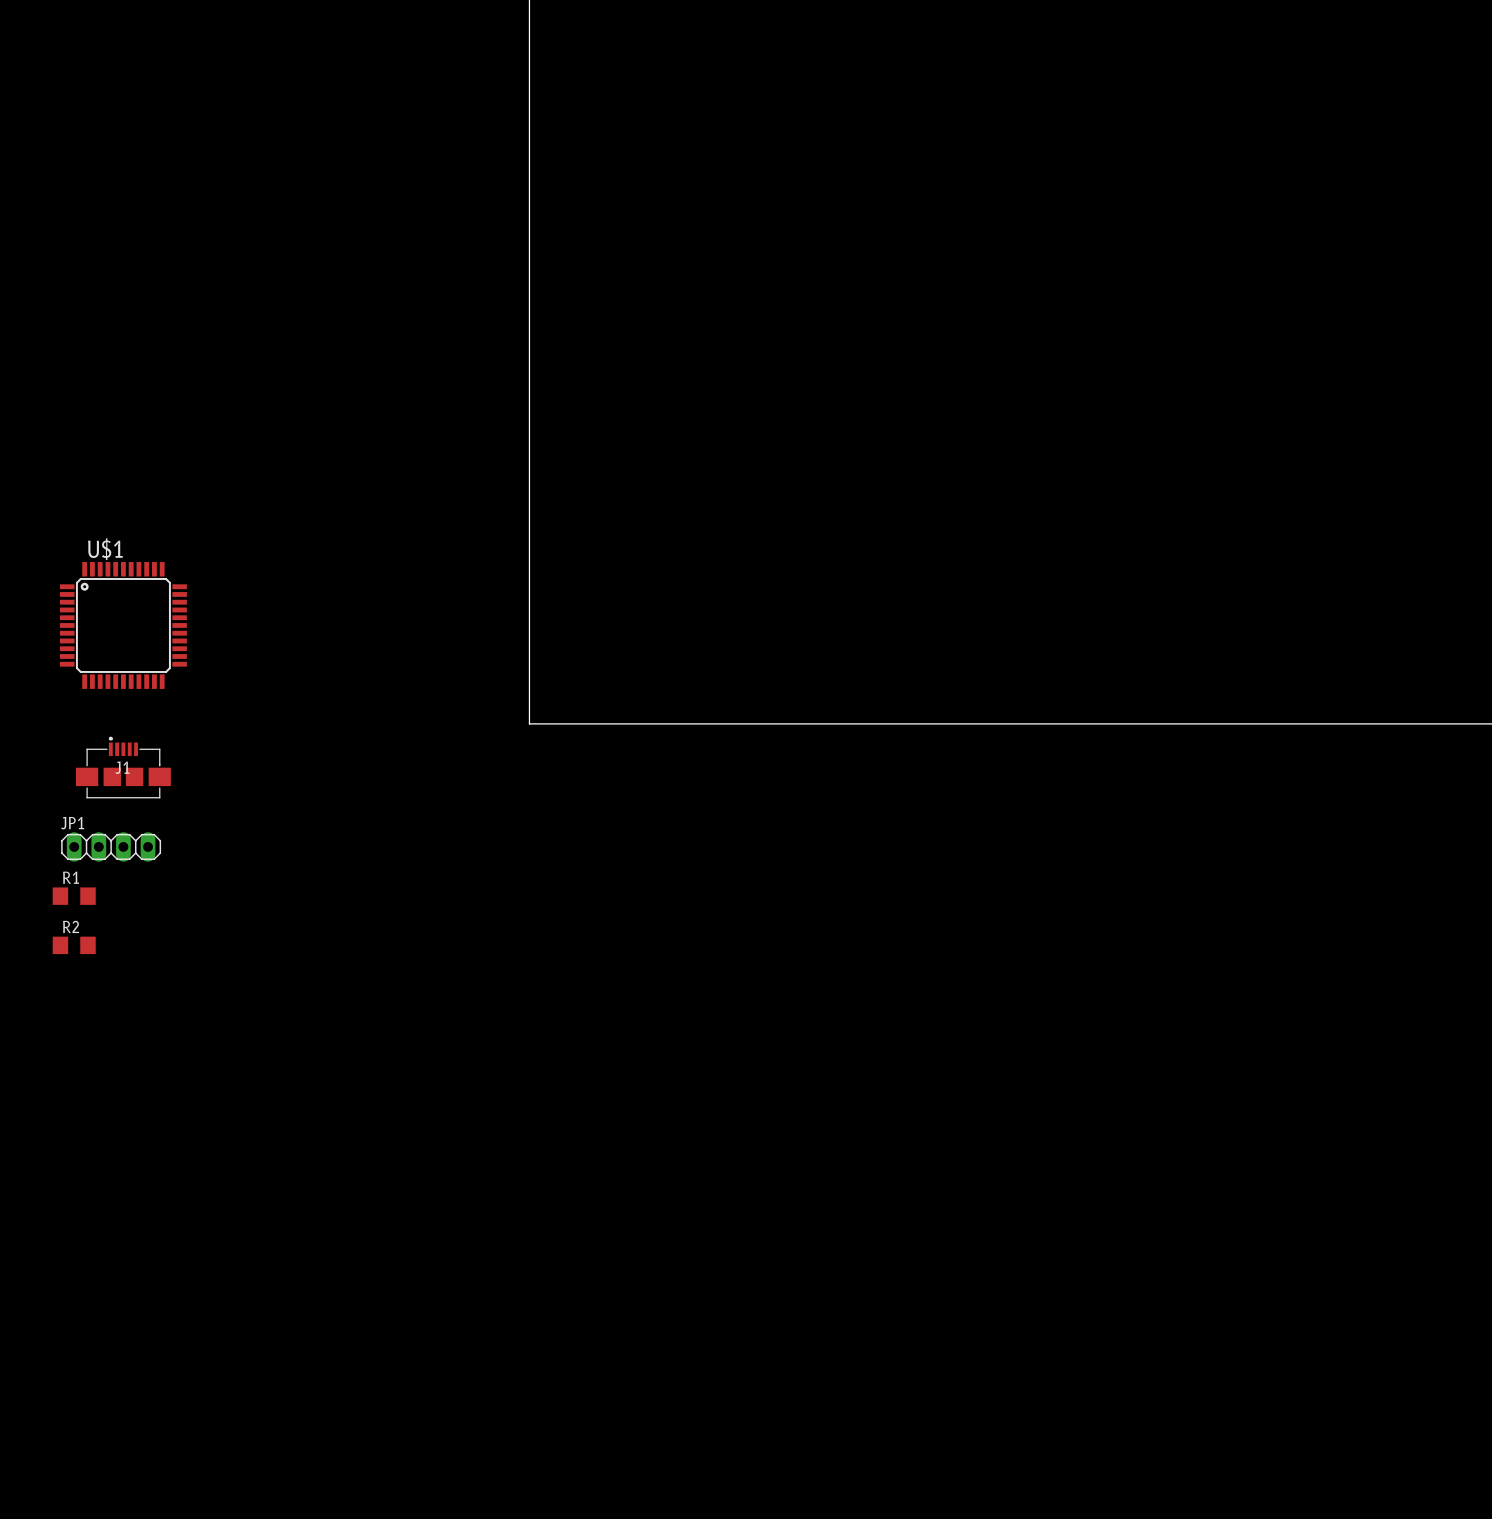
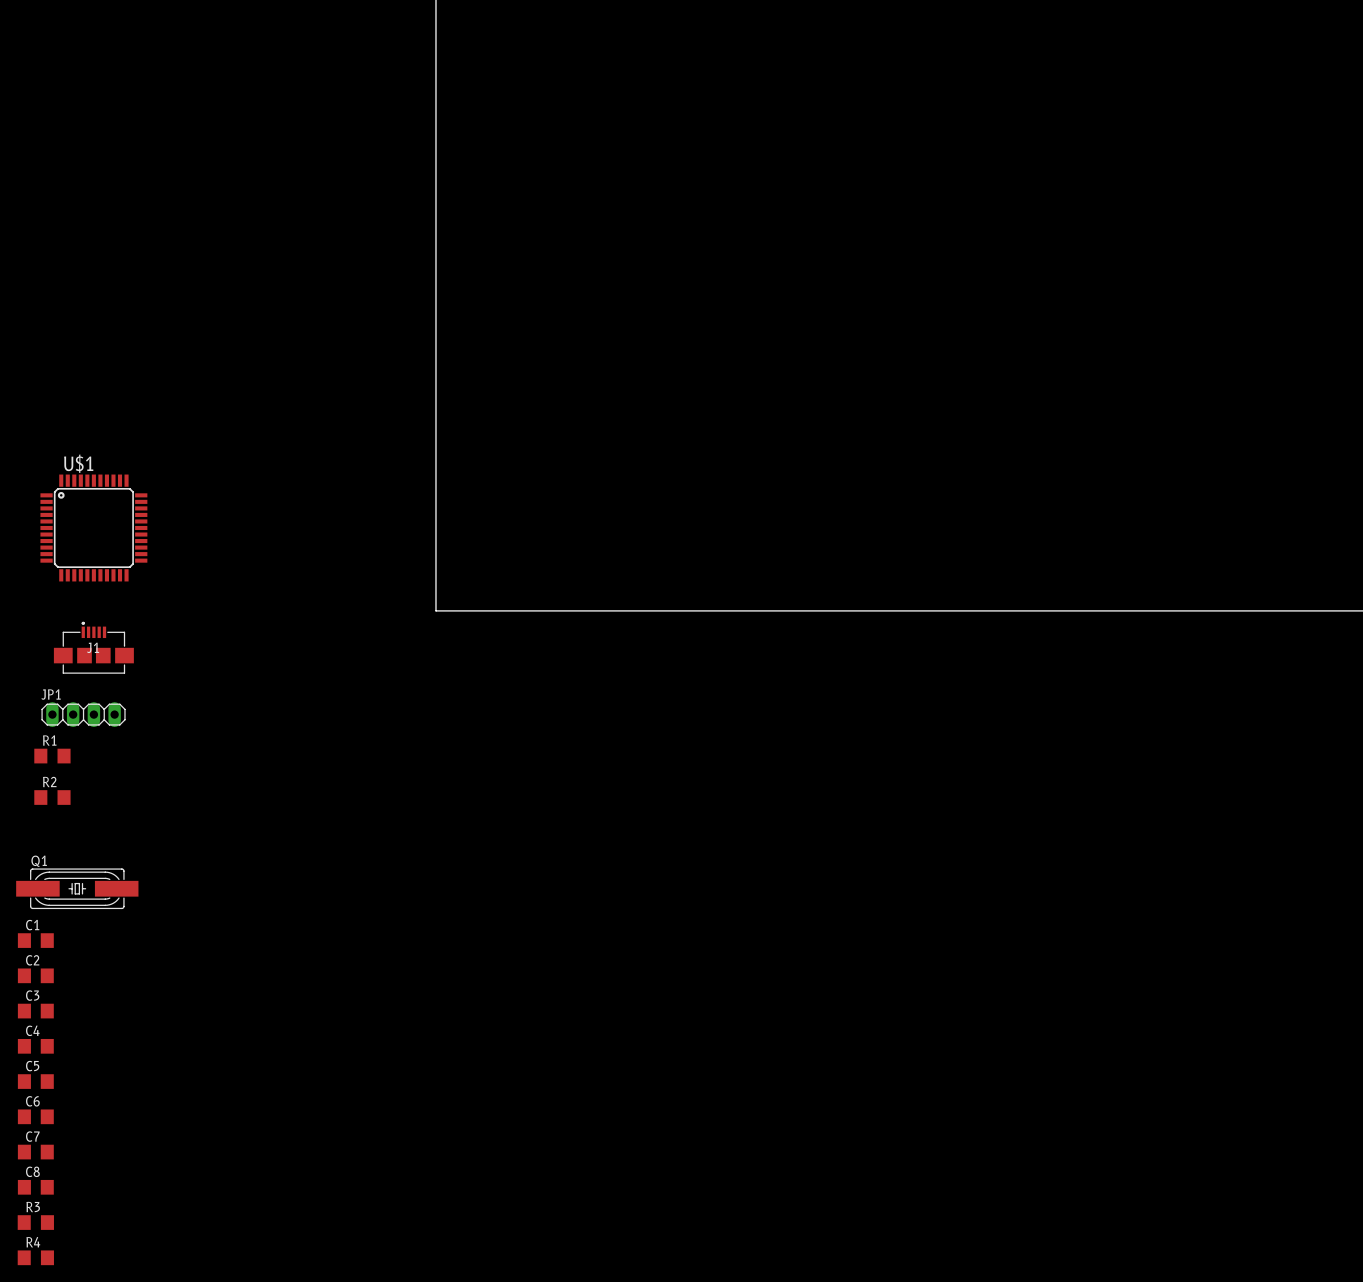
Q1: none -> (77, 888)
C1: none -> (35, 940)
C2: none -> (35, 975)
C3: none -> (35, 1011)
C4: none -> (35, 1046)
C5: none -> (35, 1081)
C6: none -> (35, 1116)
C7: none -> (35, 1152)
C8: none -> (35, 1187)
R3: none -> (35, 1222)
R4: none -> (35, 1257)

